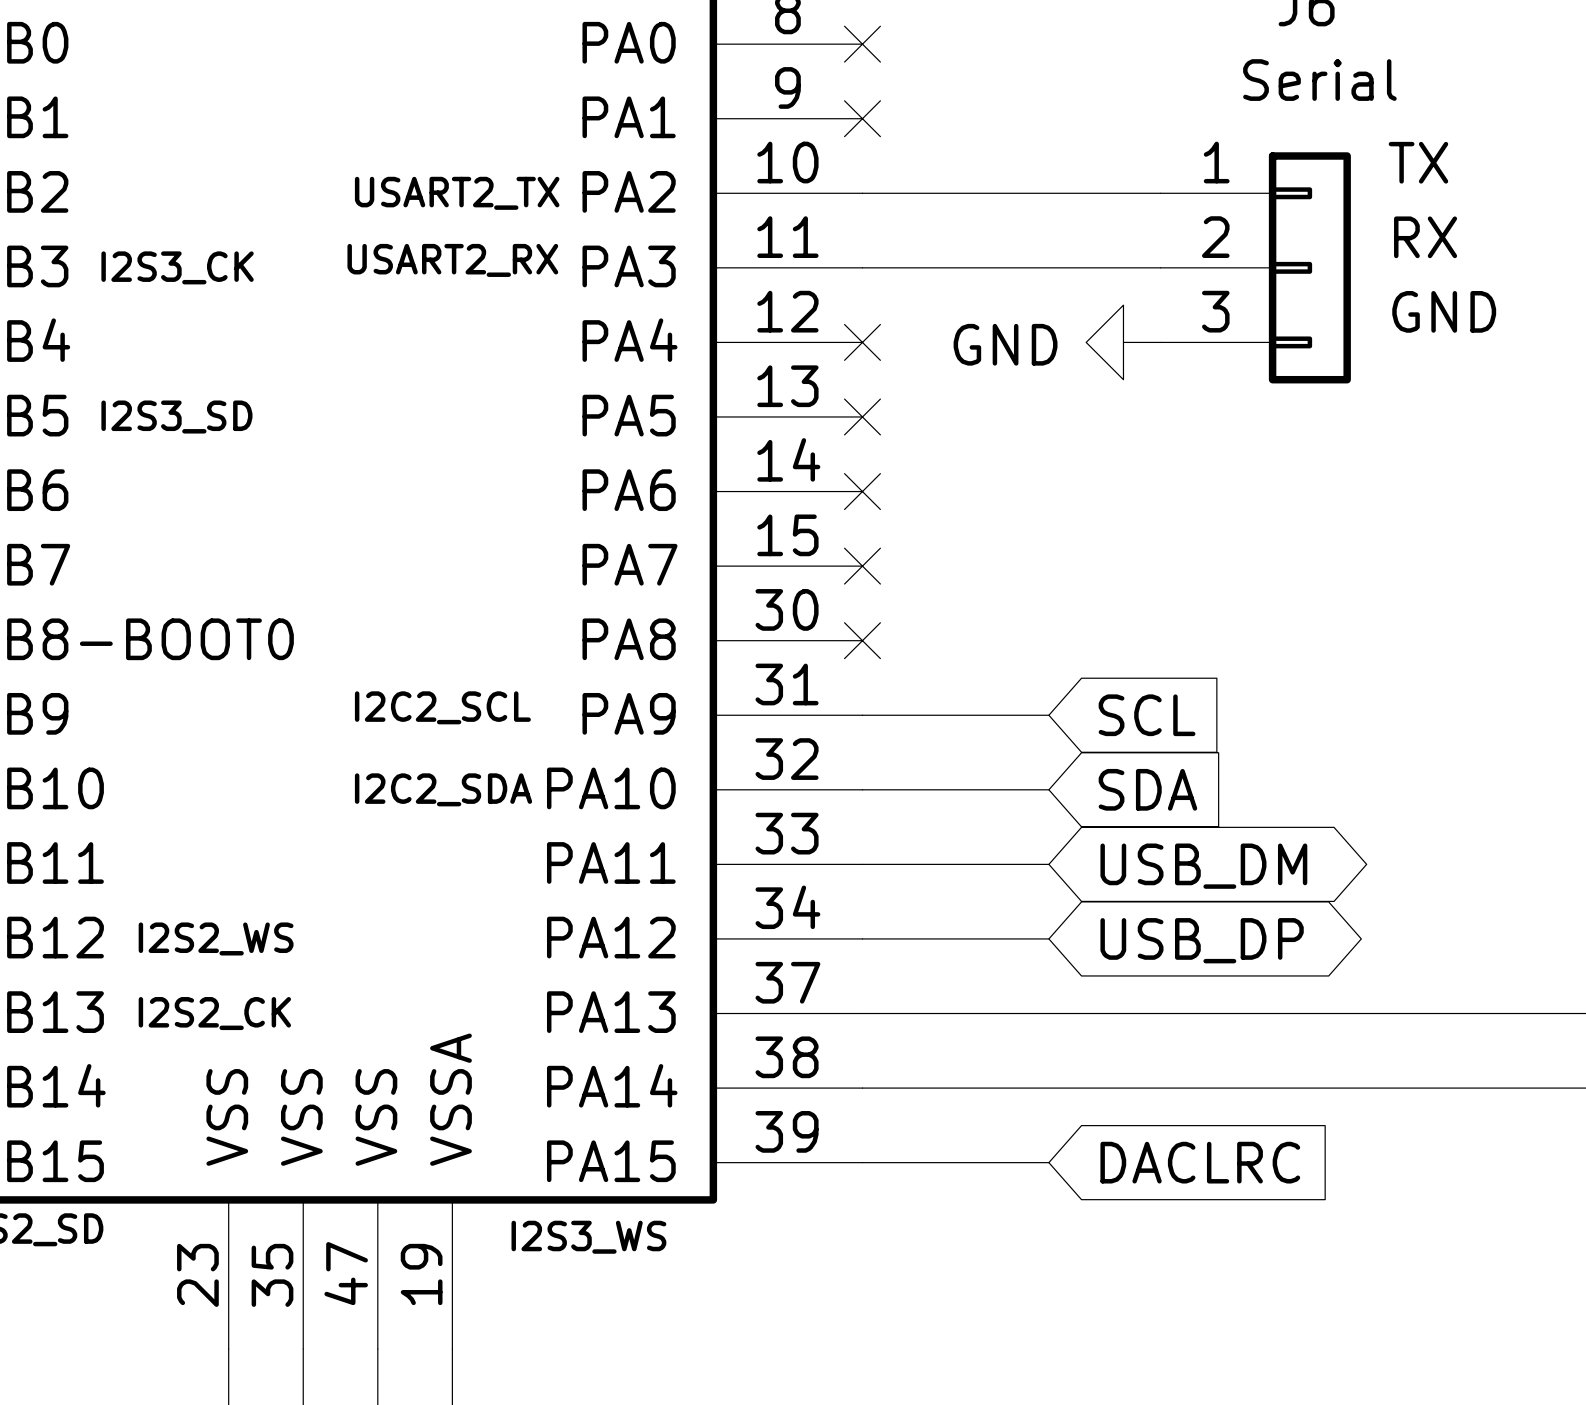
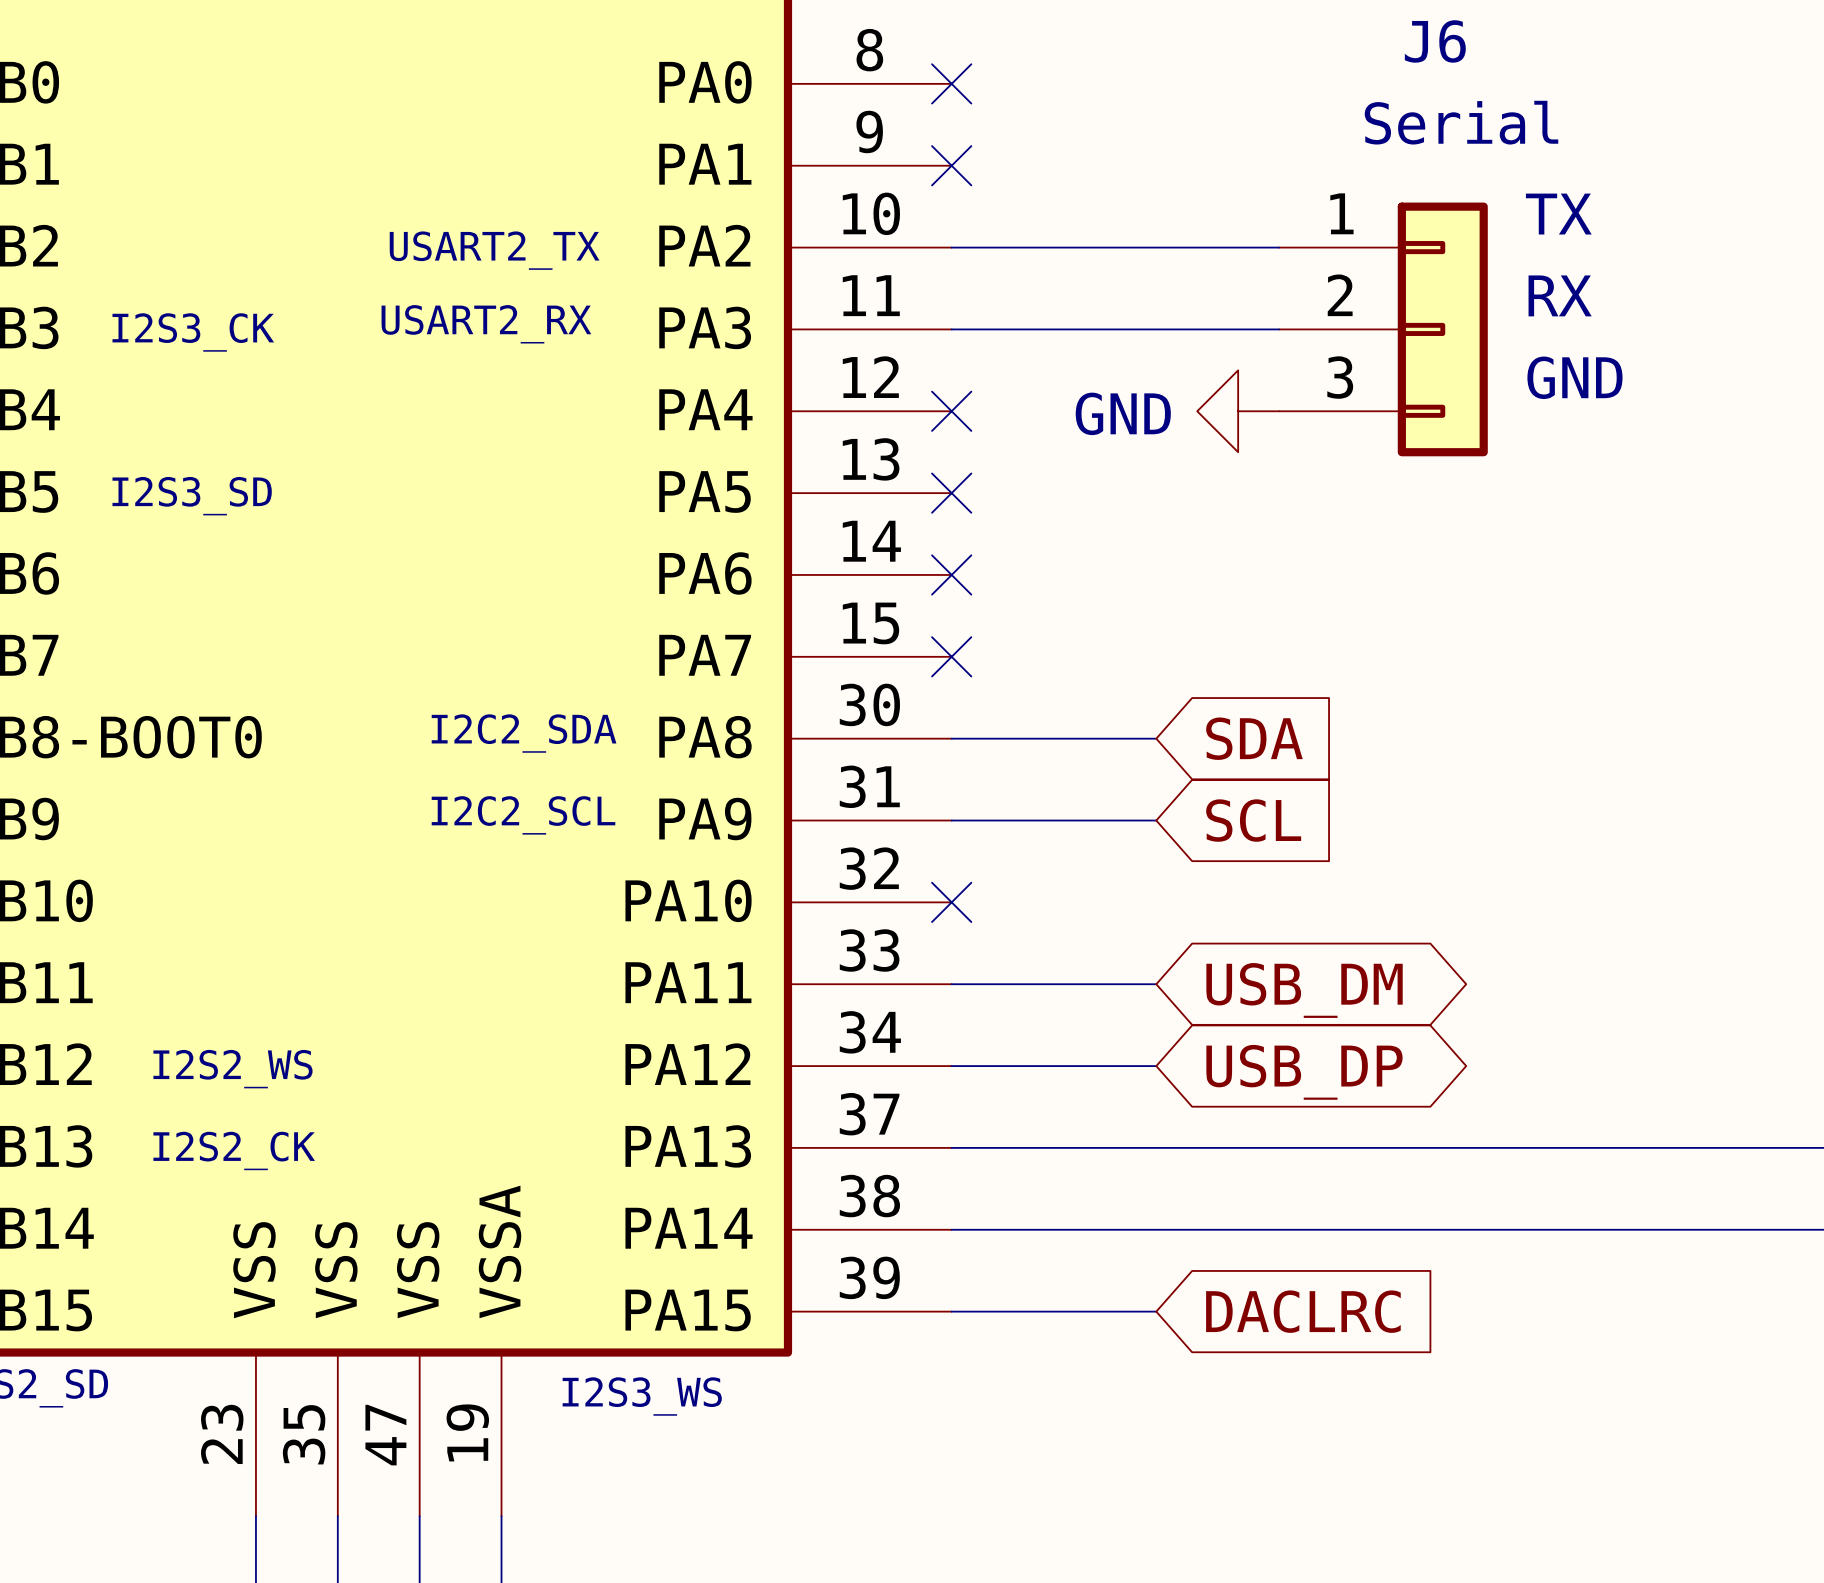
no-connect mark position: (862, 640) -> (951, 902)
text position: I2C2_SCL (442, 707) -> I2C2_SCL (523, 815)
text position: I2C2_SDA (443, 789) -> I2C2_SDA (524, 733)
wire: (862, 789) (1048, 789) -> (951, 738) (1156, 738)
global label position: SDA (1147, 789) -> SDA (1254, 738)

